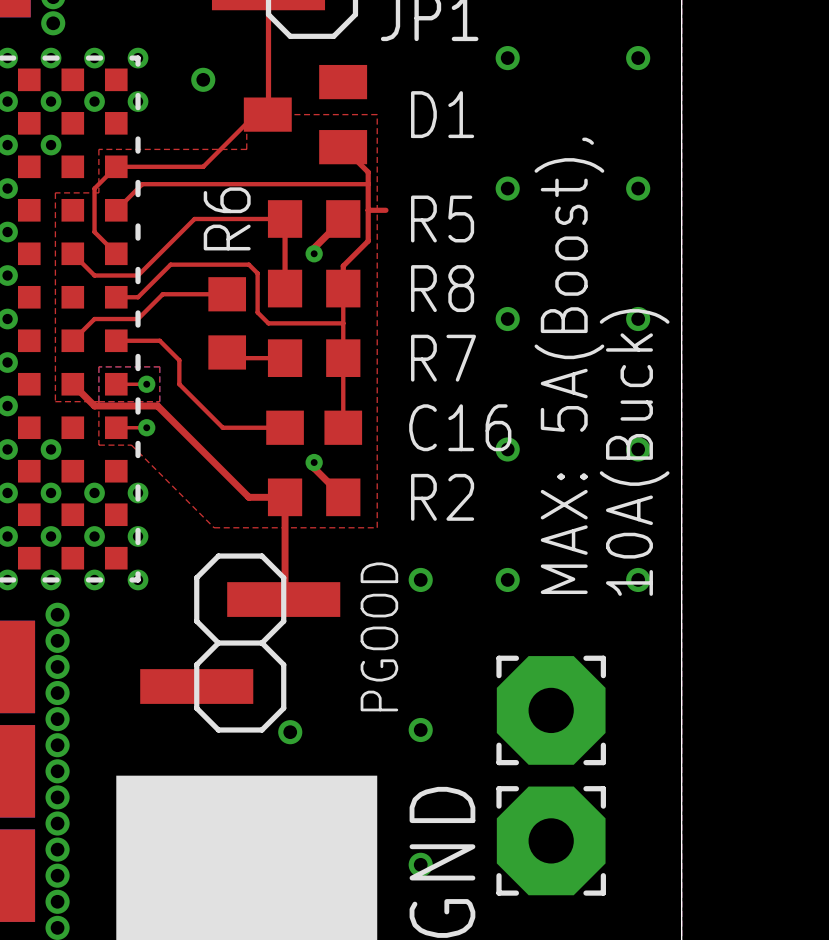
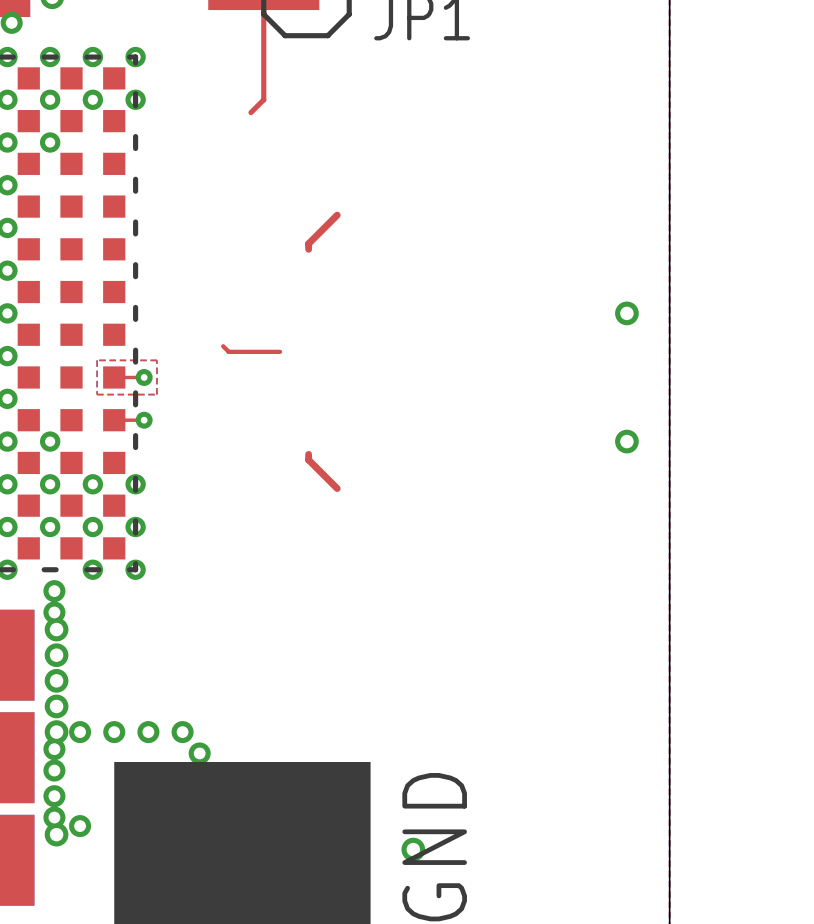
via: none -> (11, 22)
via: (53, 23) -> none
via: (507, 58) -> none
via: (638, 58) -> none
via: (203, 79) -> none
top zone outline: (246, 114) (377, 114) (377, 527) (214, 527) (131, 445) (98, 445) (98, 401) (55, 401) (55, 192) (98, 192) (98, 149) (246, 149) (246, 114) -> none
top track: (267, 114) (255, 114) (203, 166) (116, 166) (94, 188) (94, 232) (116, 253) -> none
D1: (305, 114) -> none
top track: (343, 147) (368, 172) (368, 241) (343, 266) (343, 427) -> none
top track: (368, 184) (142, 184) (116, 210) -> none
via: (507, 188) -> none
via: (638, 188) -> none
top track: (368, 210) (385, 210) -> none
R5: (314, 218) -> none
top track: (72, 253) (94, 275) (138, 275) (194, 218) (285, 218) (285, 288) -> none
via: (314, 253) -> none
R8: (314, 288) -> none
top track: (227, 294) (162, 294) (138, 319) (94, 319) (72, 340) -> none
top track: (116, 297) (138, 297) (170, 264) (248, 264) (257, 273) (257, 312) (268, 323) (343, 323) -> none
via: (507, 319) -> none
R6: (227, 323) -> none
top track: (116, 340) (159, 340) (179, 360) (179, 384) (222, 427) (285, 427) -> none
R7: (314, 358) -> none
text: MAX: 5A(Boost), (569, 365) -> none
top track: (72, 384) (94, 406) (157, 406) (248, 497) (285, 497) (285, 601) (283, 599) -> none
C16: (314, 427) -> none
via: (507, 449) -> none
text: 10A(Buck) (634, 452) -> none
via: (314, 462) -> none
R2: (314, 497) -> none
via: (51, 579) -> none
via: (420, 579) -> none
via: (507, 579) -> none
via: (638, 579) -> none
via: none -> (54, 591)
via: (57, 614) -> none
via: none -> (54, 612)
text: PGOOD (379, 636) -> none
part: (240, 643) -> none
part: (551, 710) -> none
via: (420, 730) -> none
via: (290, 732) -> none
via: none -> (80, 732)
via: none -> (114, 732)
via: none -> (148, 732)
via: none -> (182, 732)
via: none -> (54, 749)
via: none -> (199, 753)
via: (57, 771) -> none
via: none -> (54, 770)
via: (57, 797) -> none
via: none -> (54, 796)
via: (57, 823) -> none
via: none -> (54, 817)
via: none -> (80, 826)
part: (551, 840) -> none
via: (57, 875) -> none
via: (57, 901) -> none
via: (57, 927) -> none

